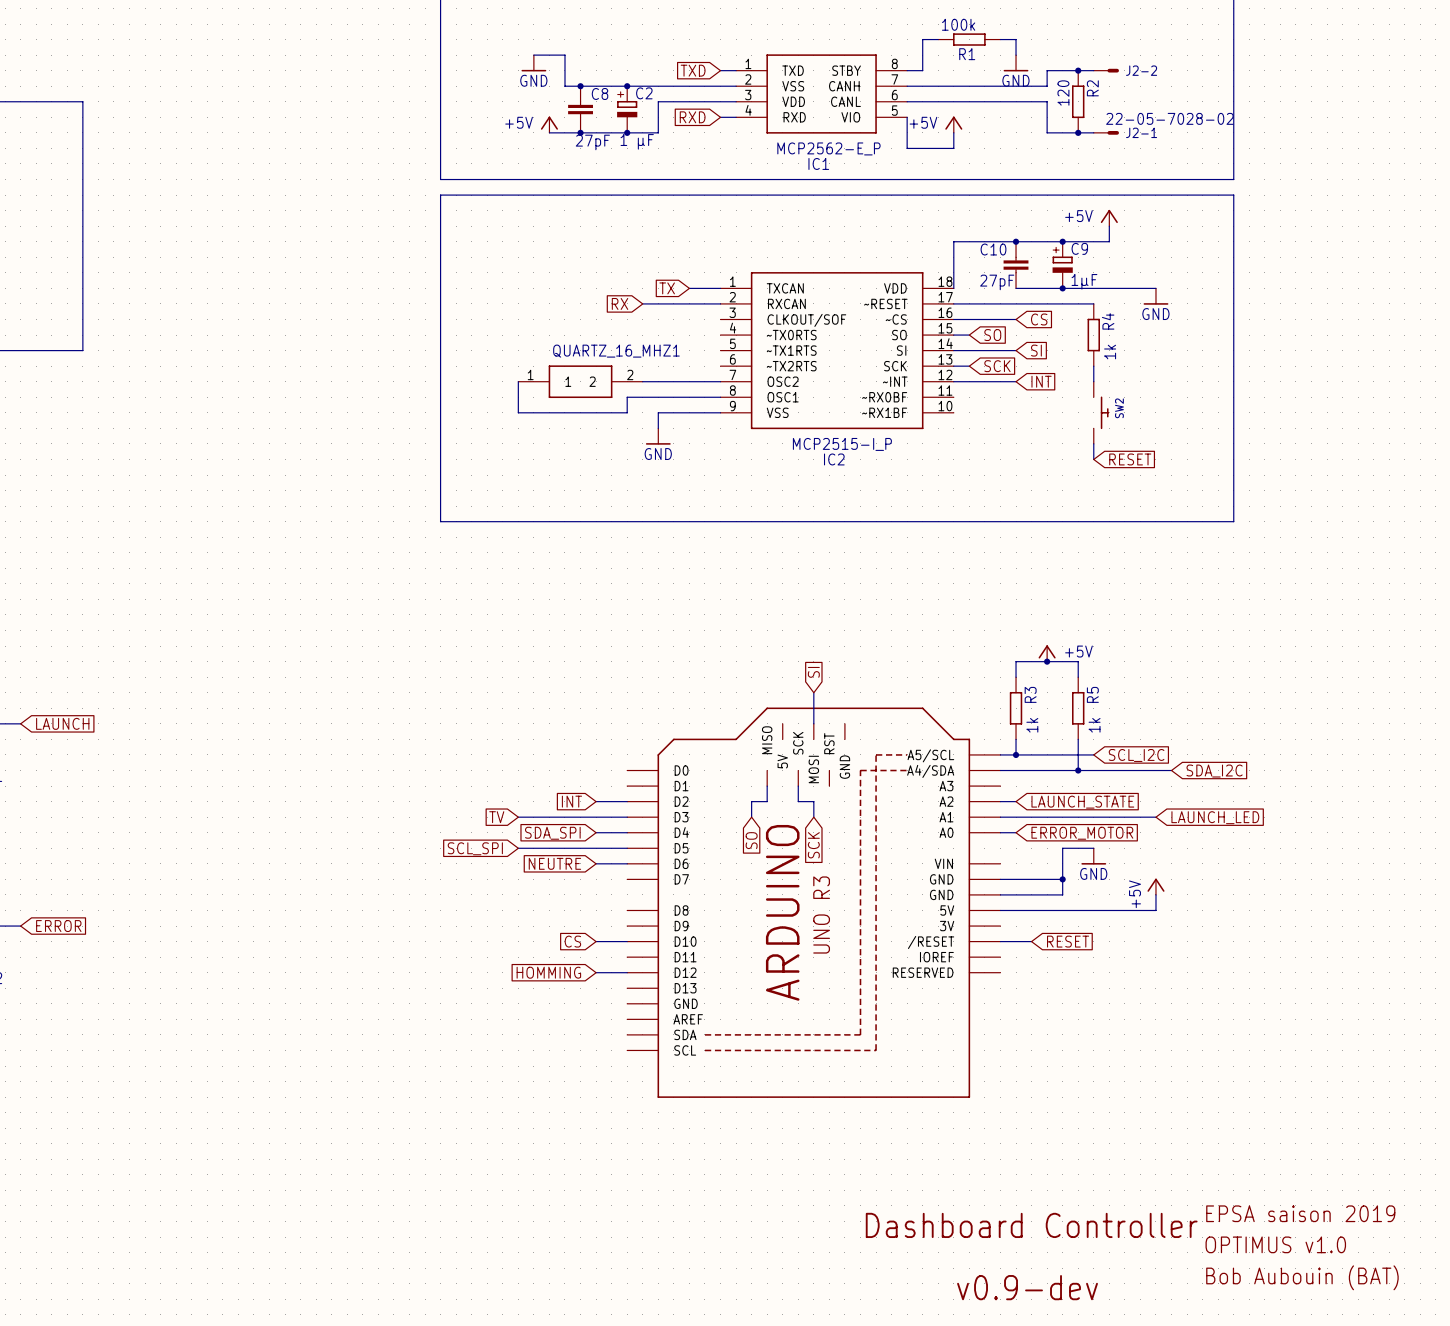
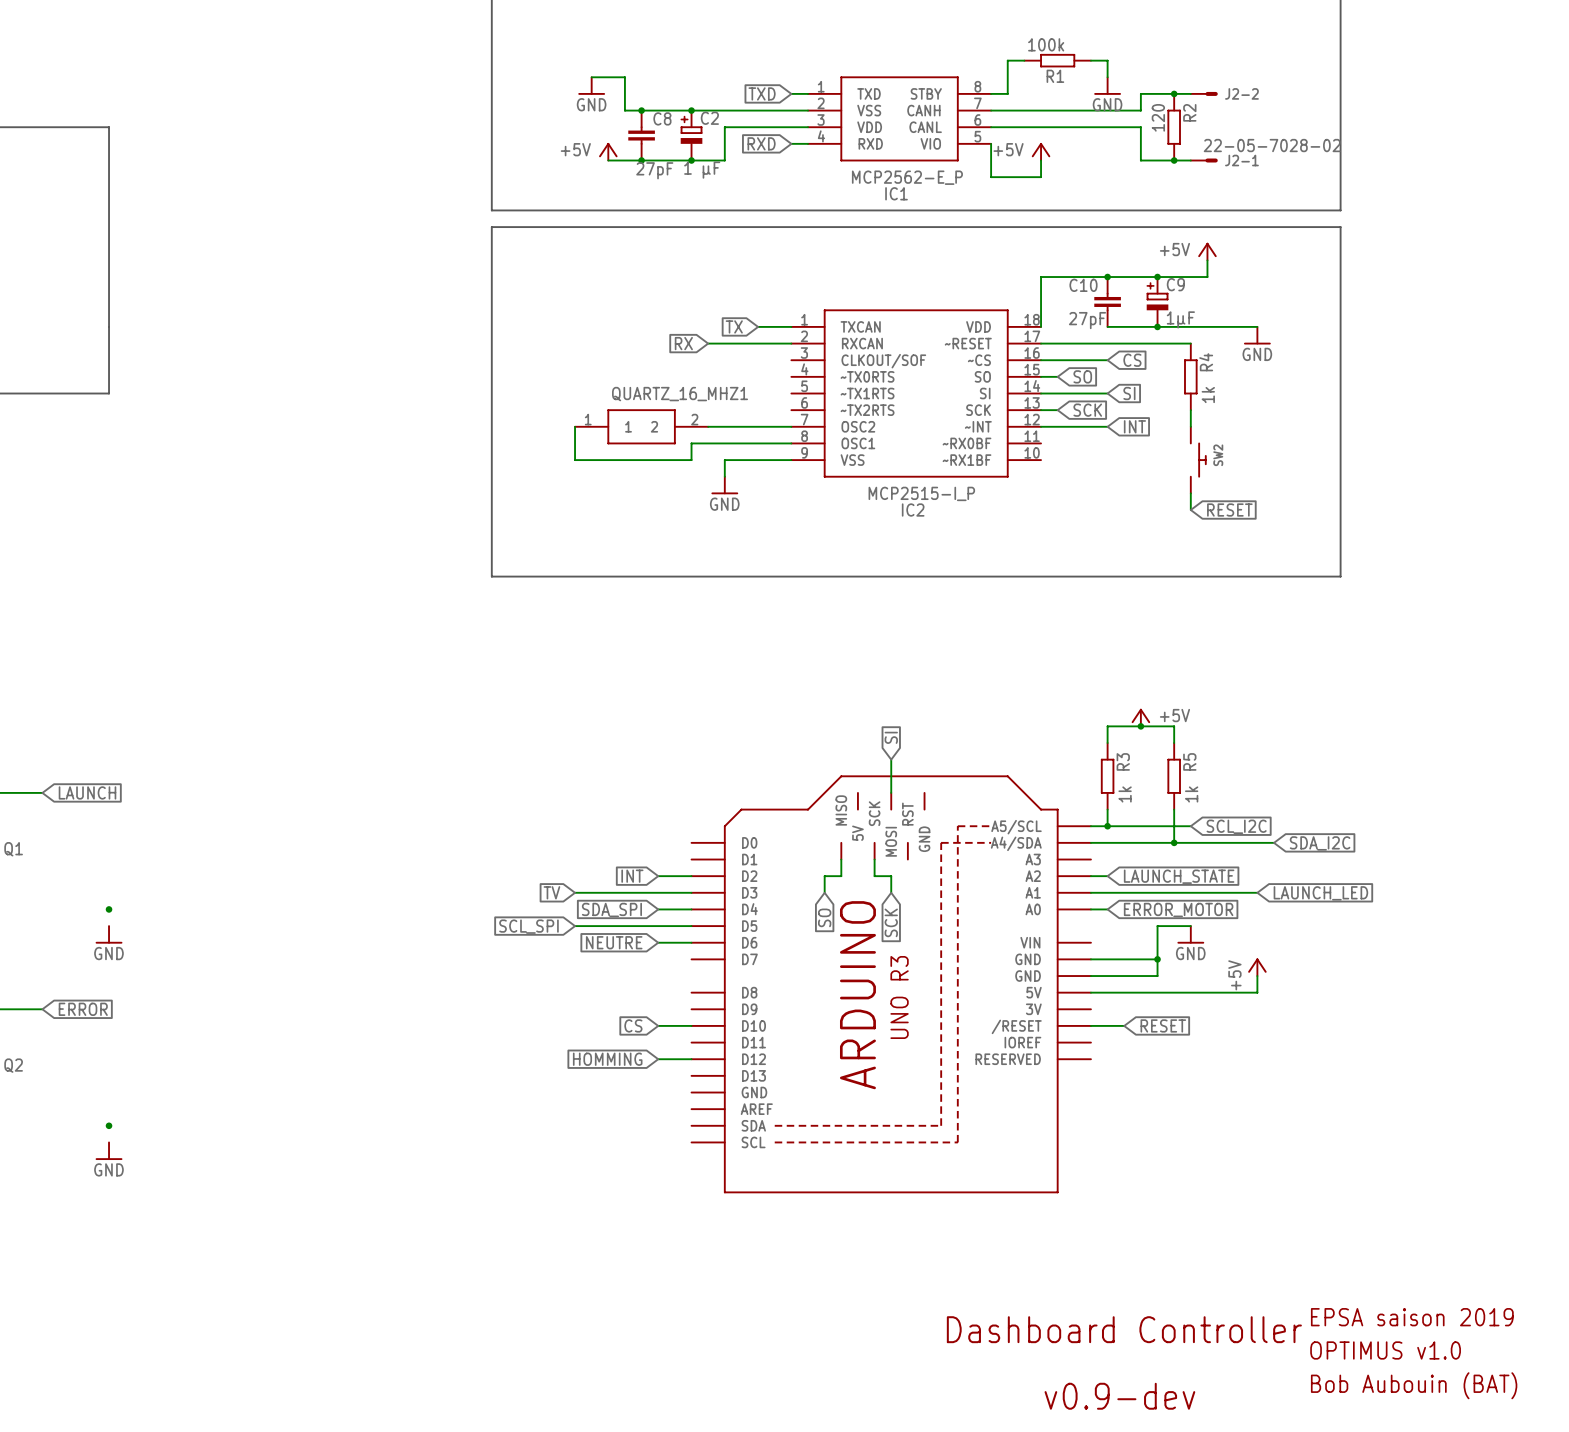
junction: none -> (109, 909)
power symbol: none -> GND (109, 934)
junction: none -> (109, 1125)
power symbol: none -> GND (109, 1151)

